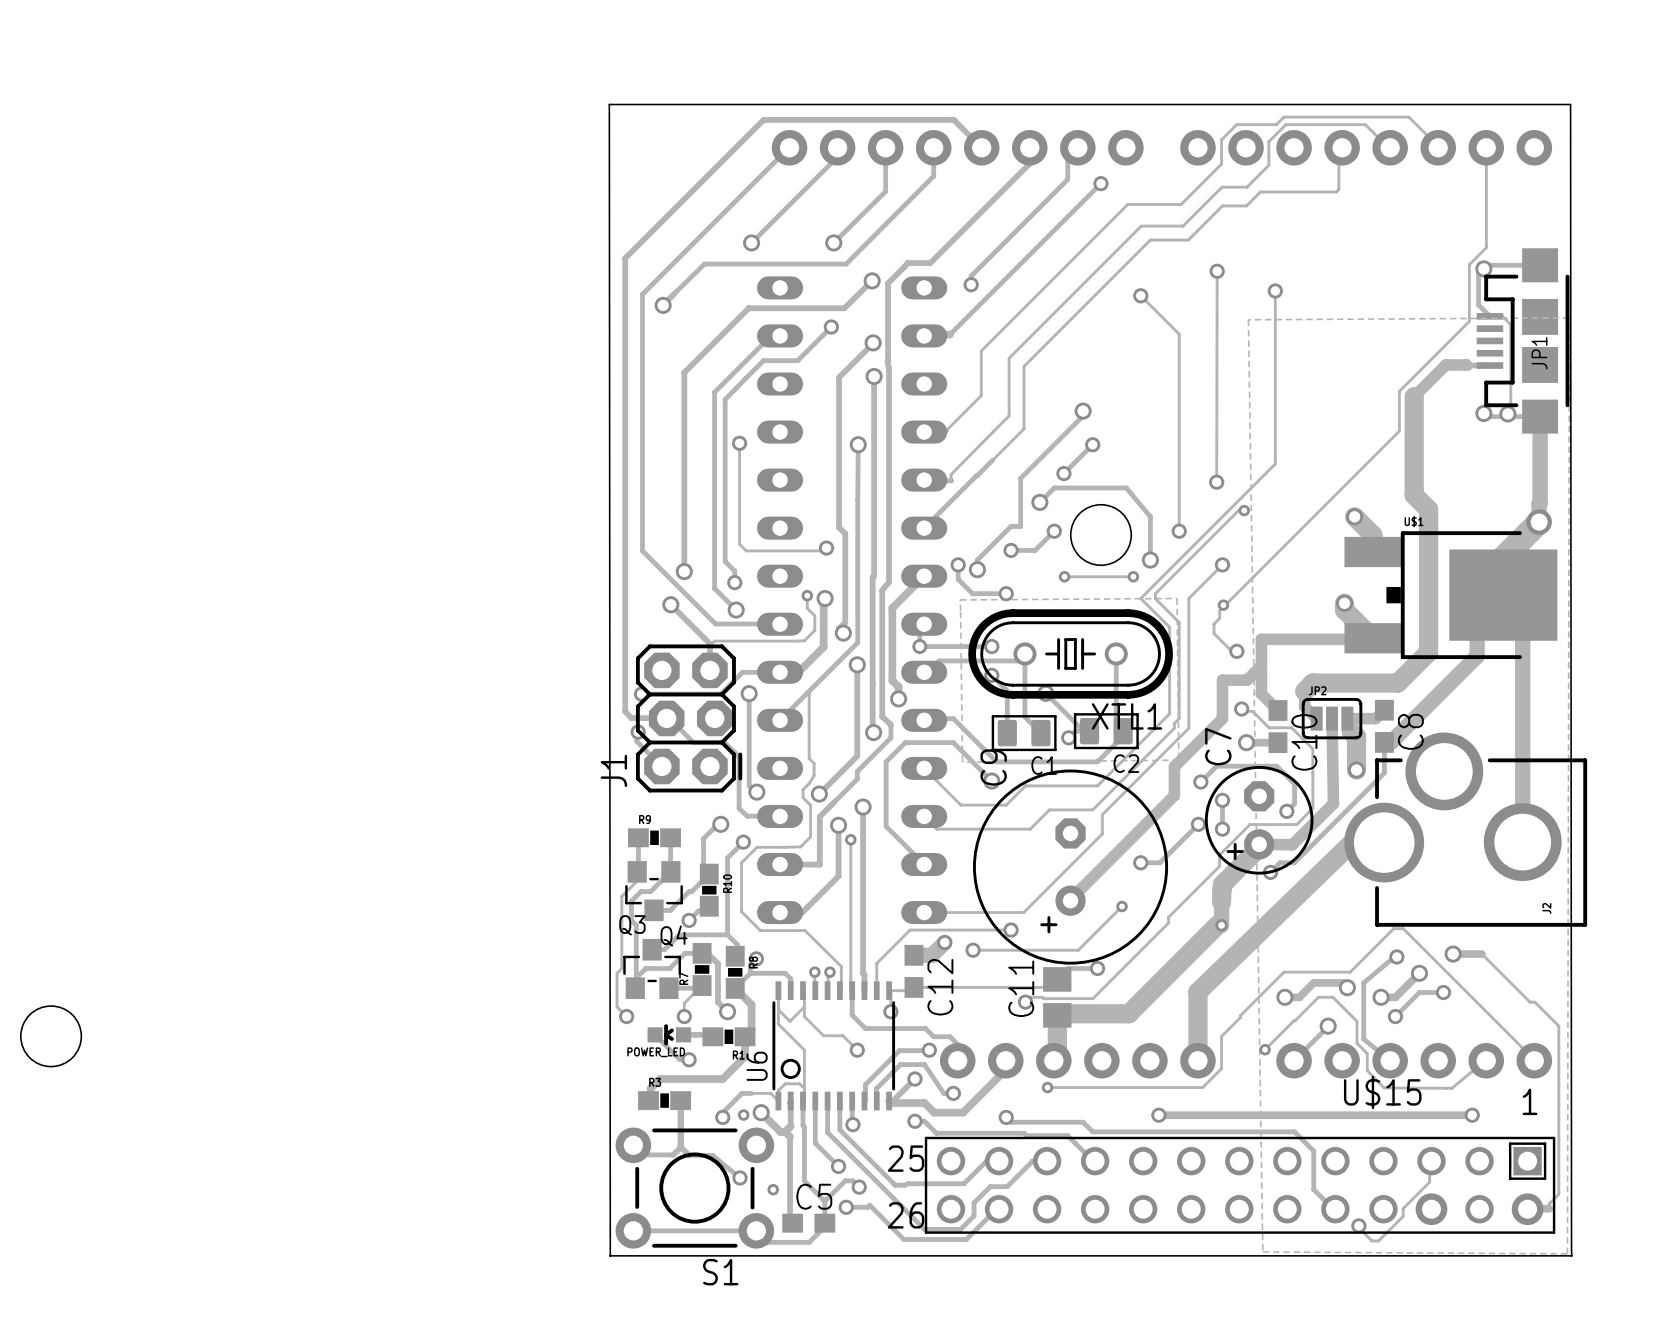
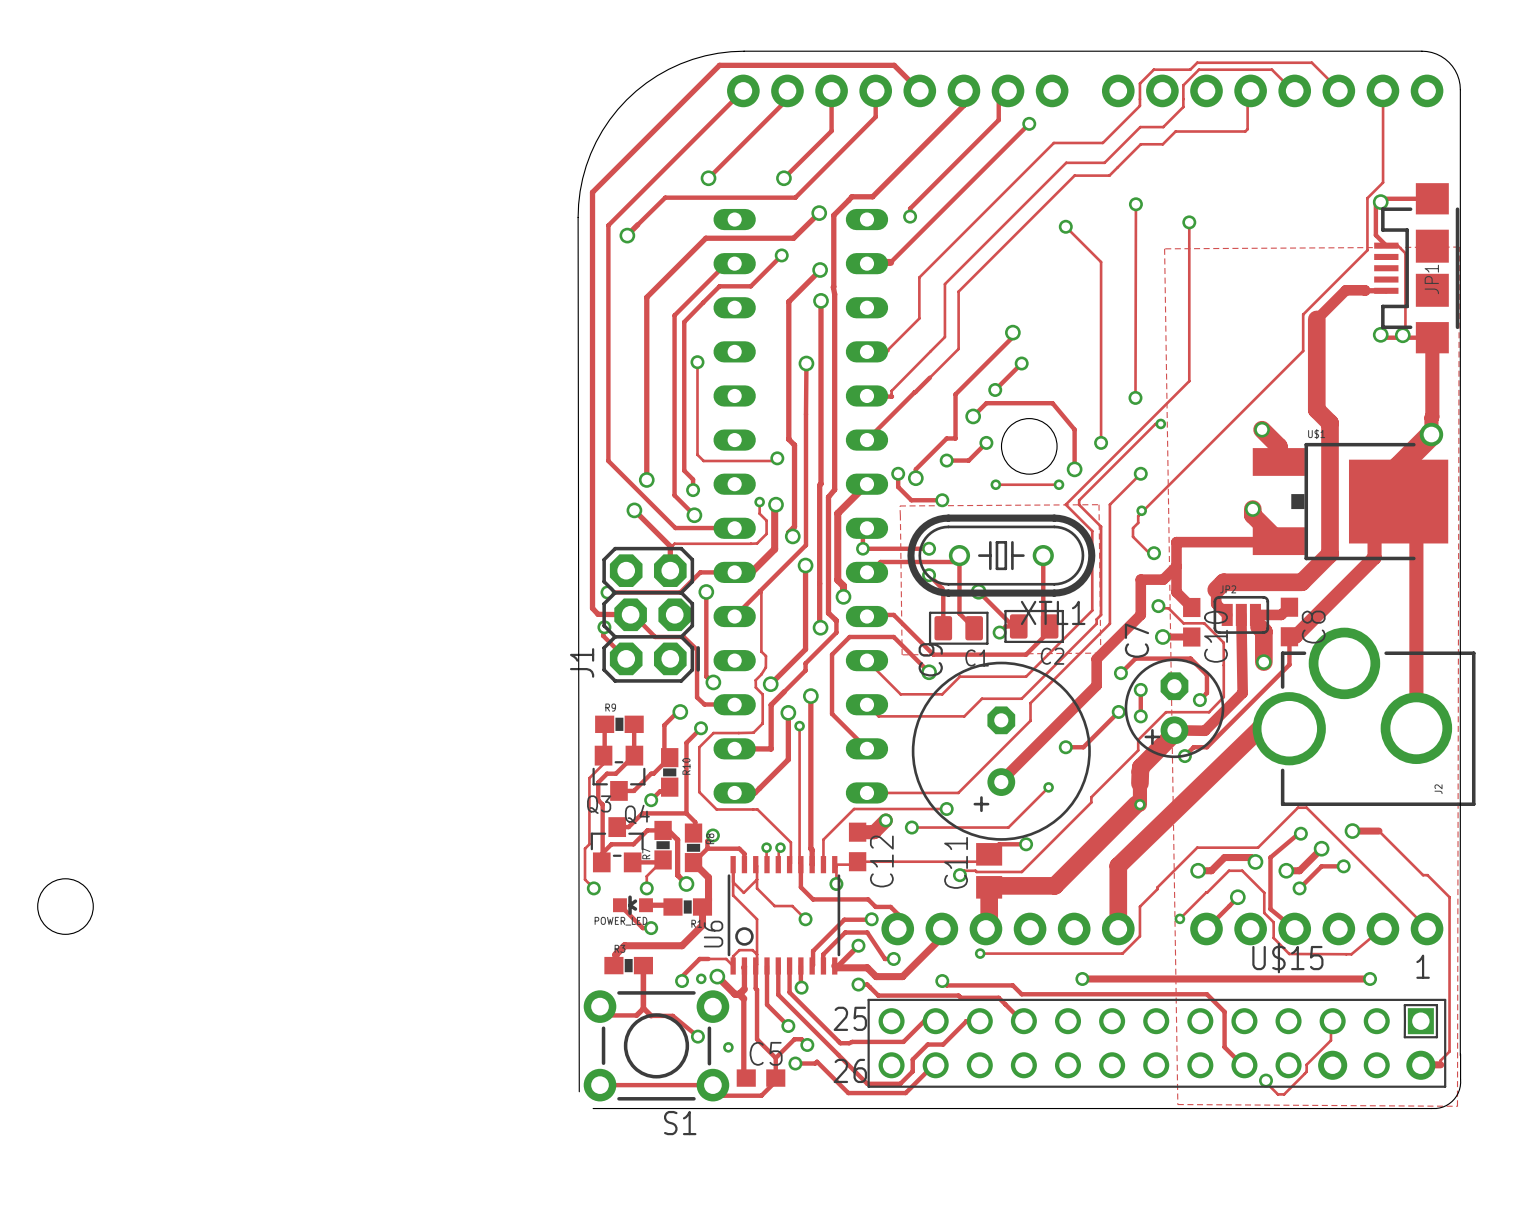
board edge: (790, 104) (609, 104) (610, 1256) -> (744, 51) (718, 53) (692, 59) (668, 69) (636, 91) (609, 119) (596, 141) (586, 166) (580, 191) (578, 217) (579, 1091)
board edge: (1528, 104) (1570, 104) (1571, 1255) (610, 1255) -> (1421, 51) (1436, 54) (1449, 62) (1457, 74) (1460, 89) (1460, 1055)
board edge: none -> (1460, 1054) (1460, 1082) (1458, 1093) (1449, 1103) (1436, 1108) (593, 1108)

